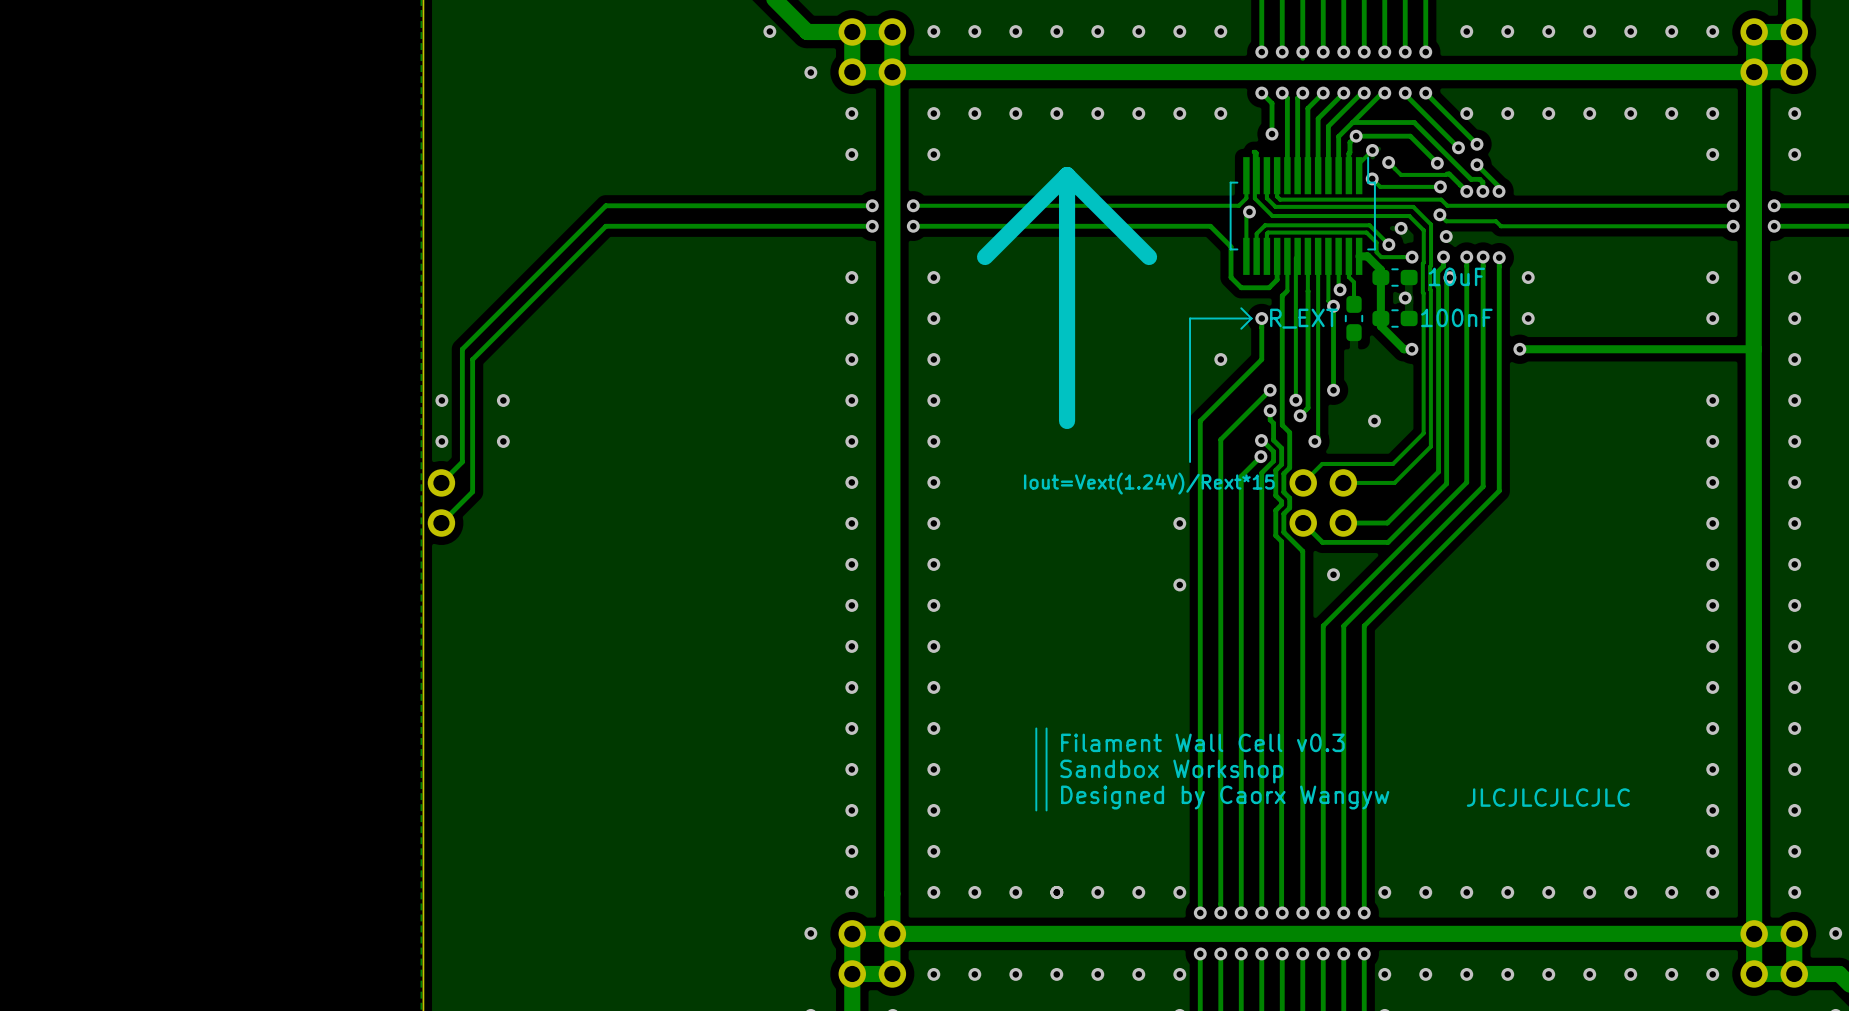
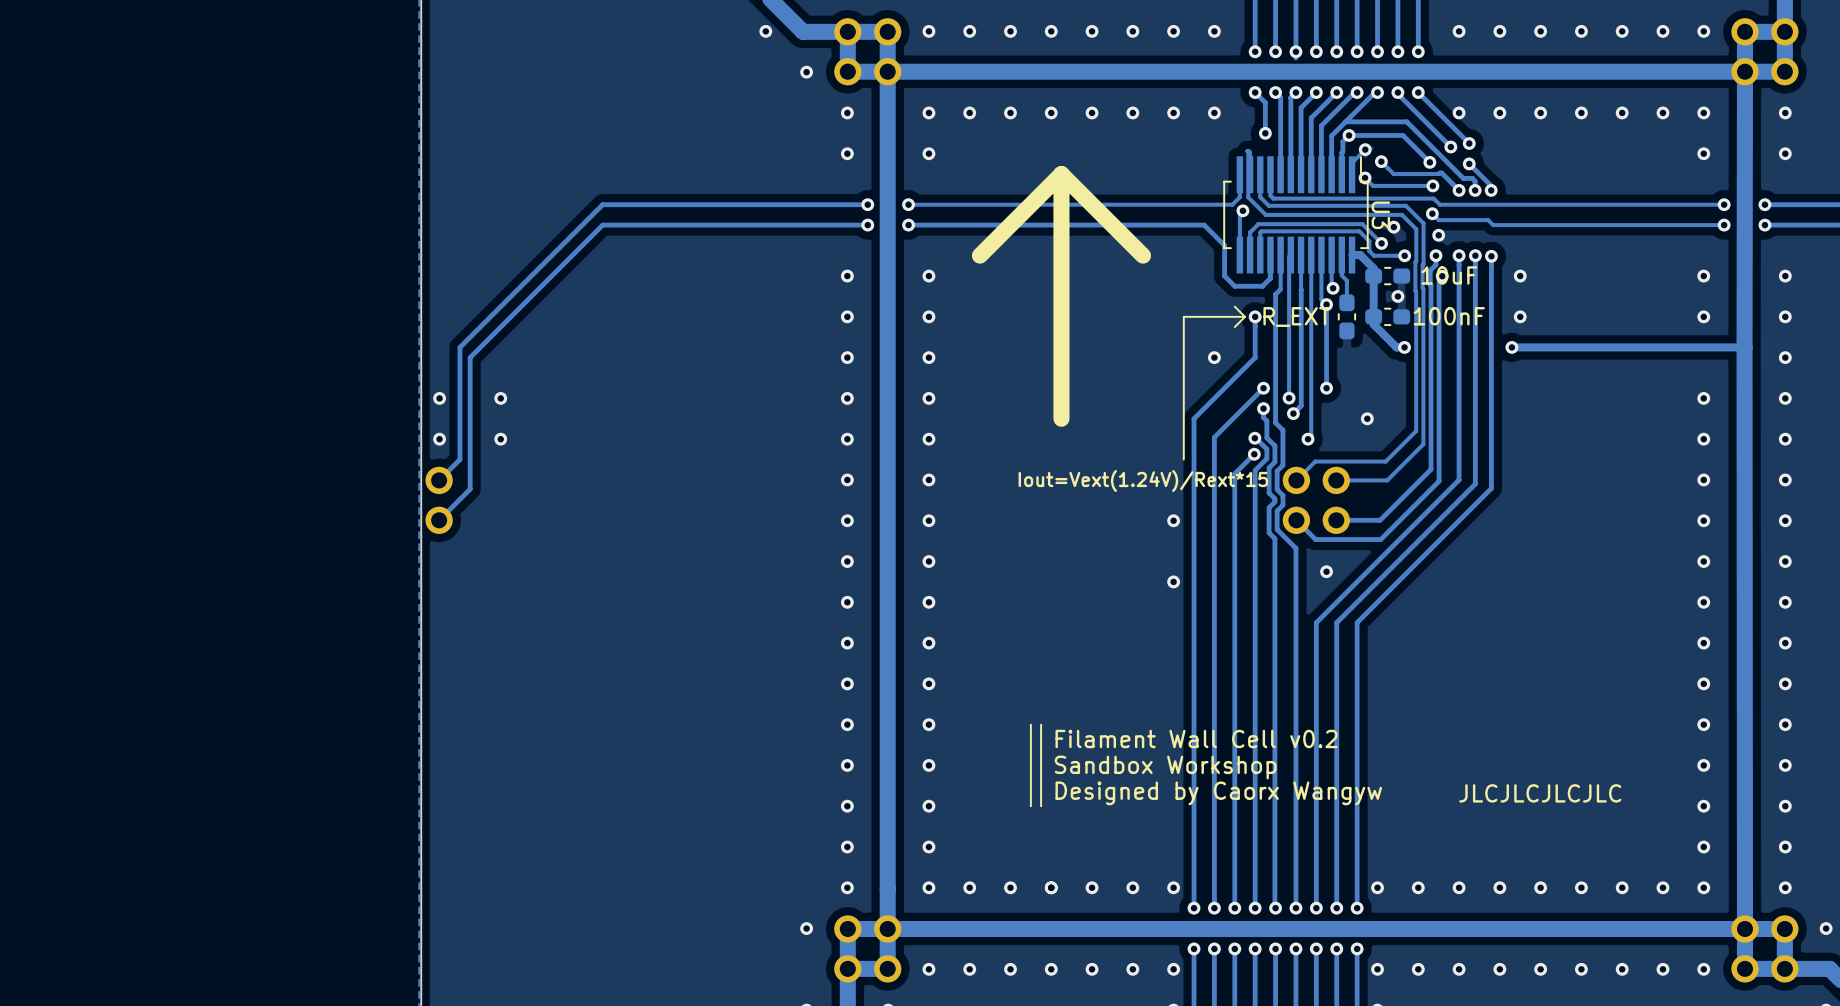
U3 name: none -> U3 (1380, 215)
text: Filament Wall Cell v0.3 (1202, 742) -> Filament Wall Cell v0.2 (1196, 738)

